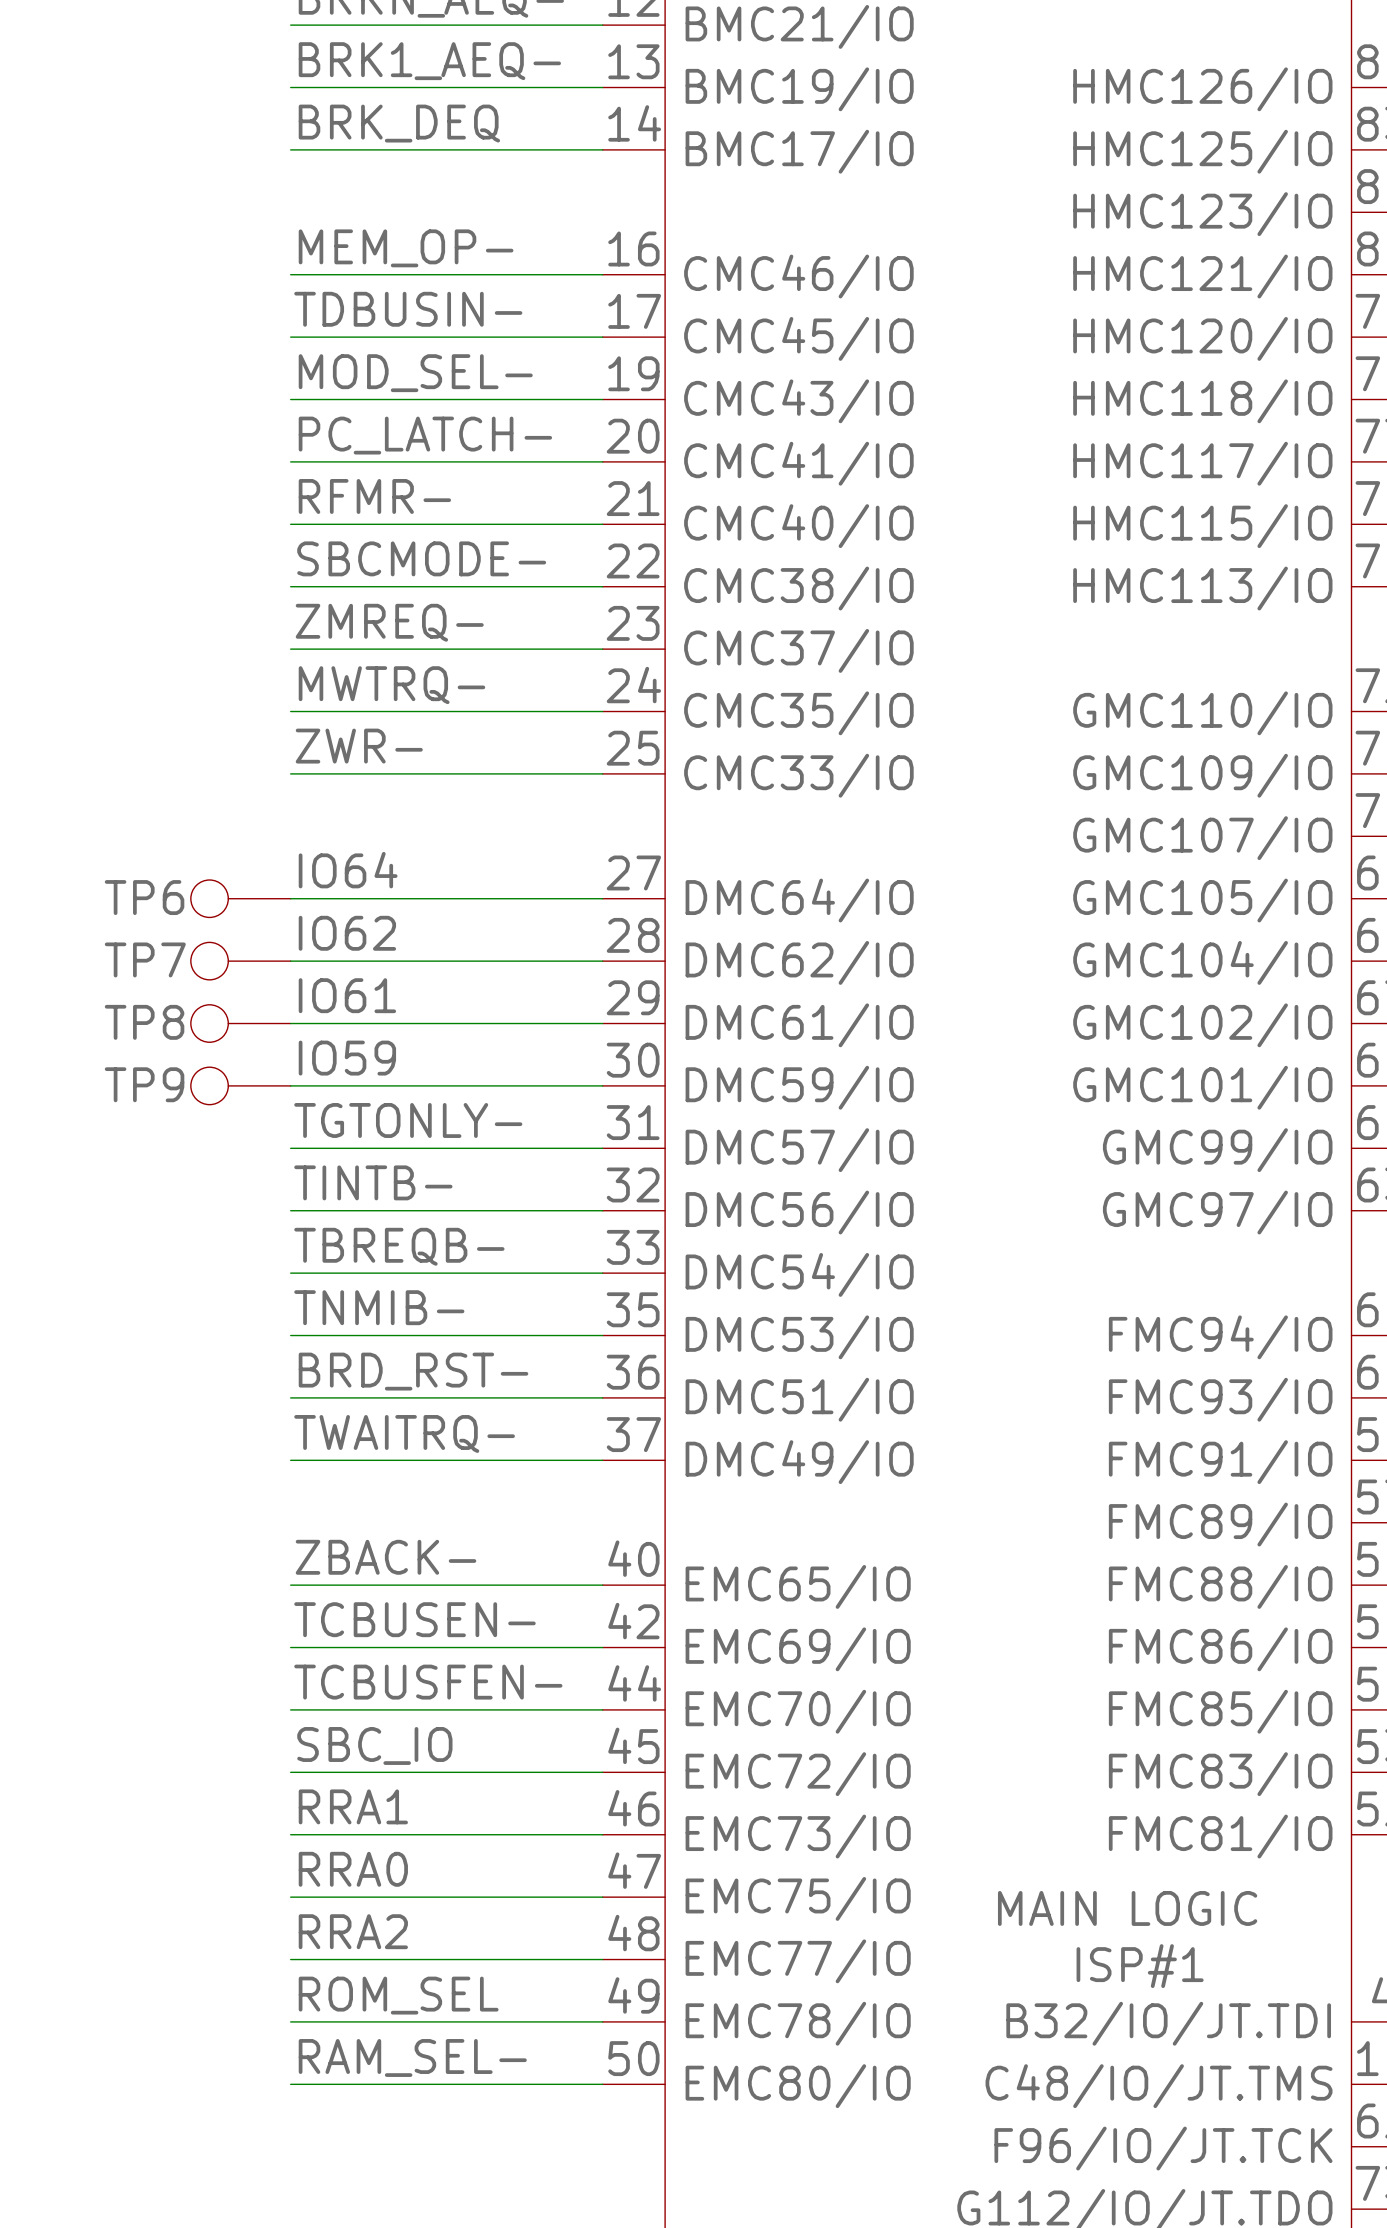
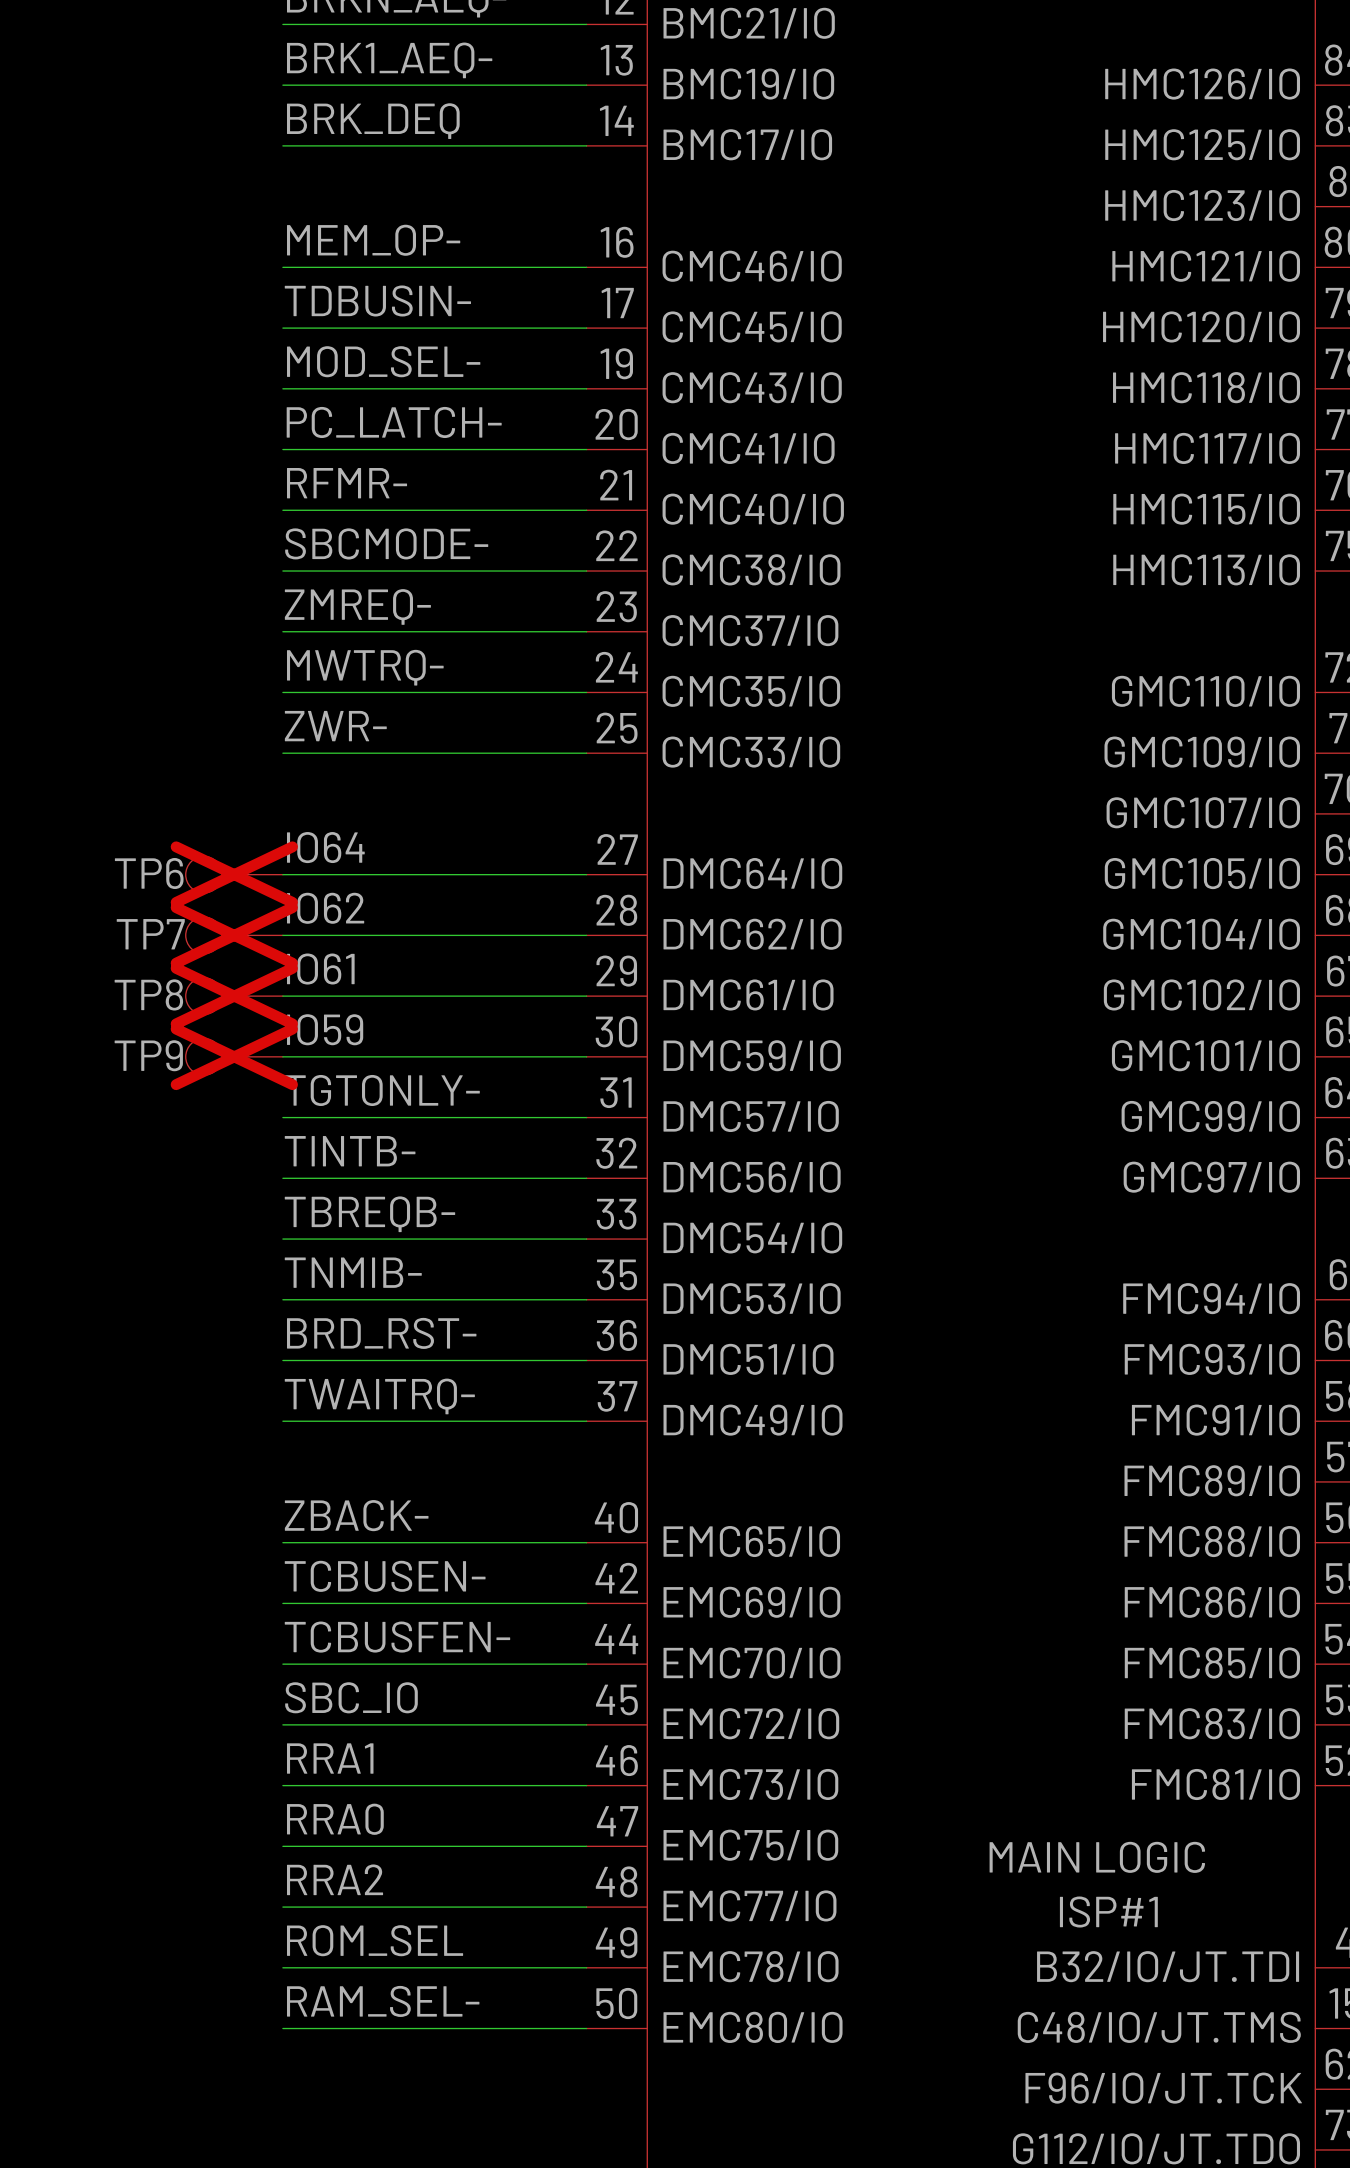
TP6 do-not-place cross: none -> (234, 874)
TP7 do-not-place cross: none -> (234, 935)
TP8 do-not-place cross: none -> (234, 996)
TP9 do-not-place cross: none -> (234, 1056)

